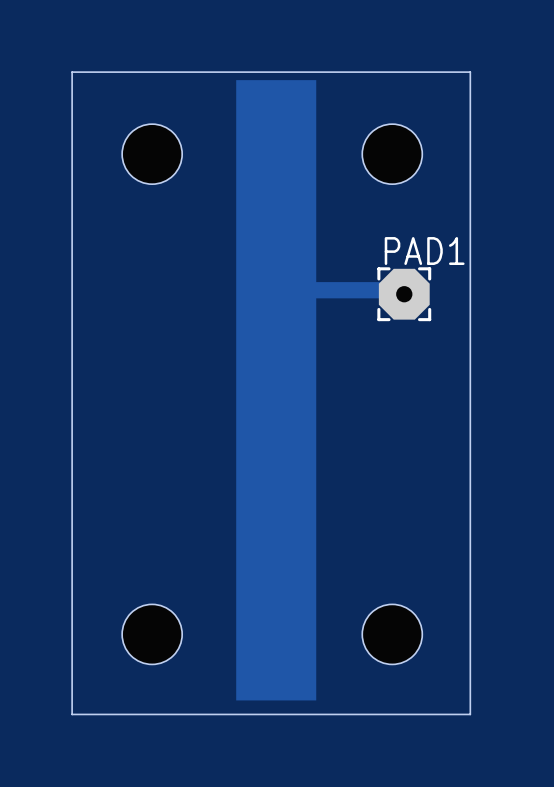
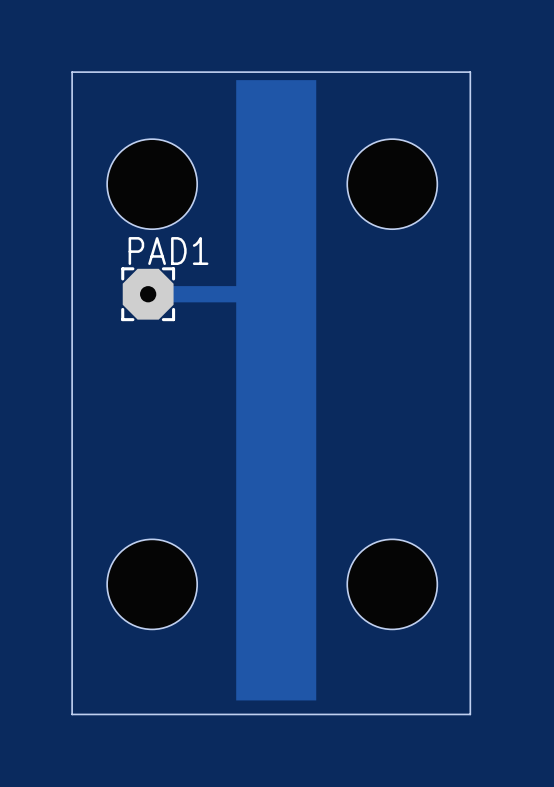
hole: (152, 154) -> none
hole: (392, 154) -> none
hole: none -> (152, 184)
hole: none -> (392, 184)
track: (264, 290) (400, 290) (404, 294) -> none
track: none -> (148, 294) (264, 294)
PAD1 position: (404, 294) -> (148, 294)
hole: none -> (152, 584)
hole: none -> (392, 584)
hole: (152, 634) -> none
hole: (392, 634) -> none

